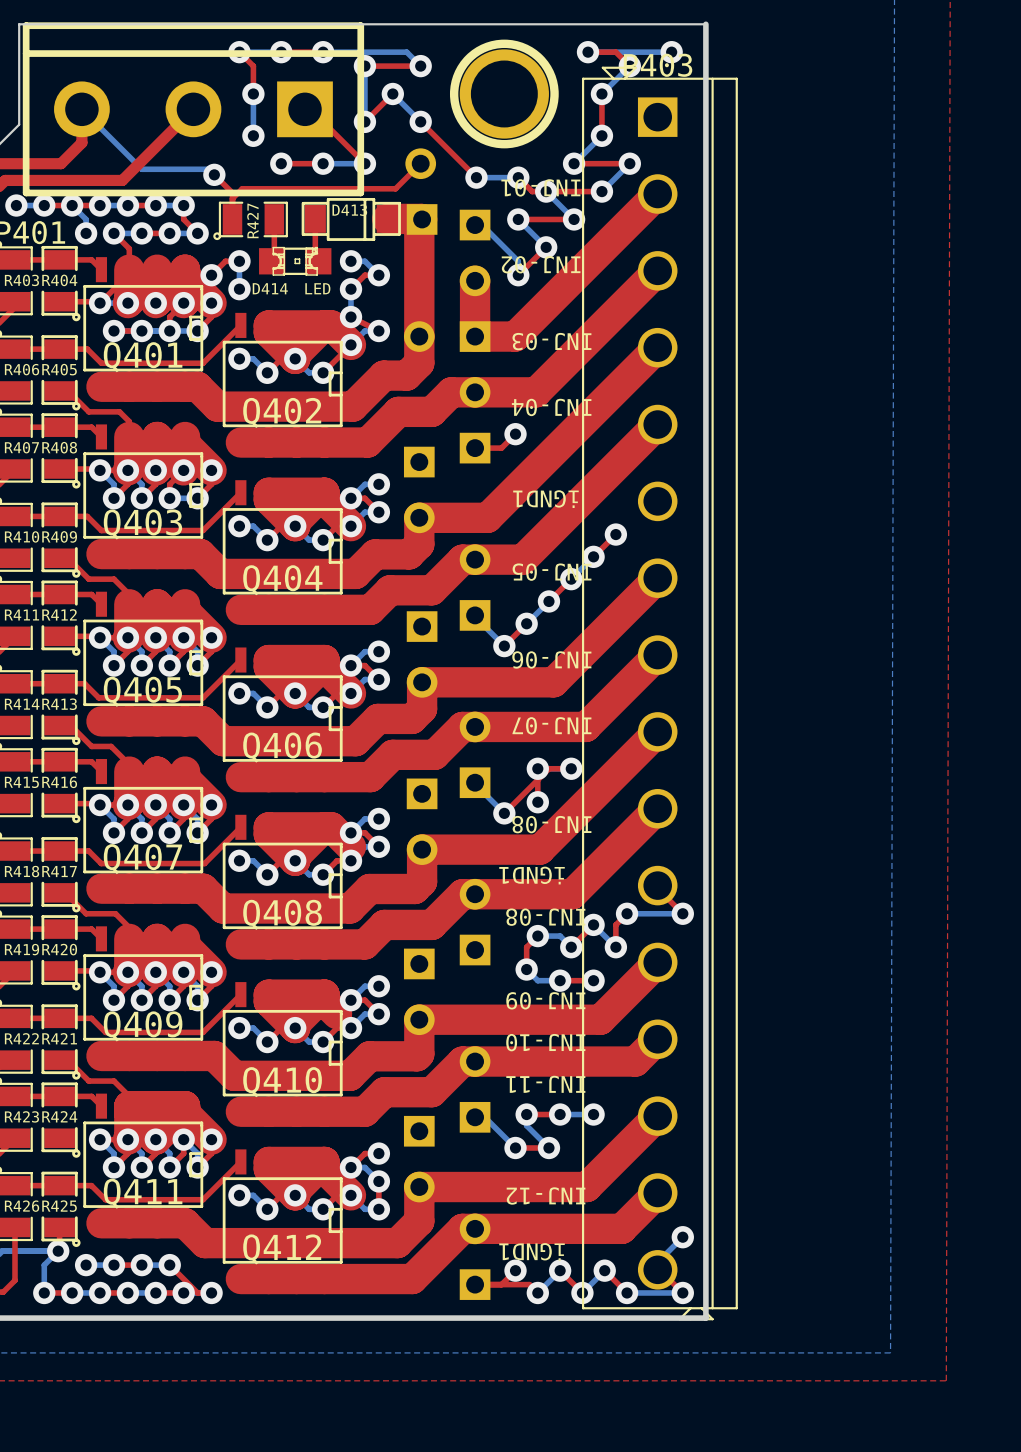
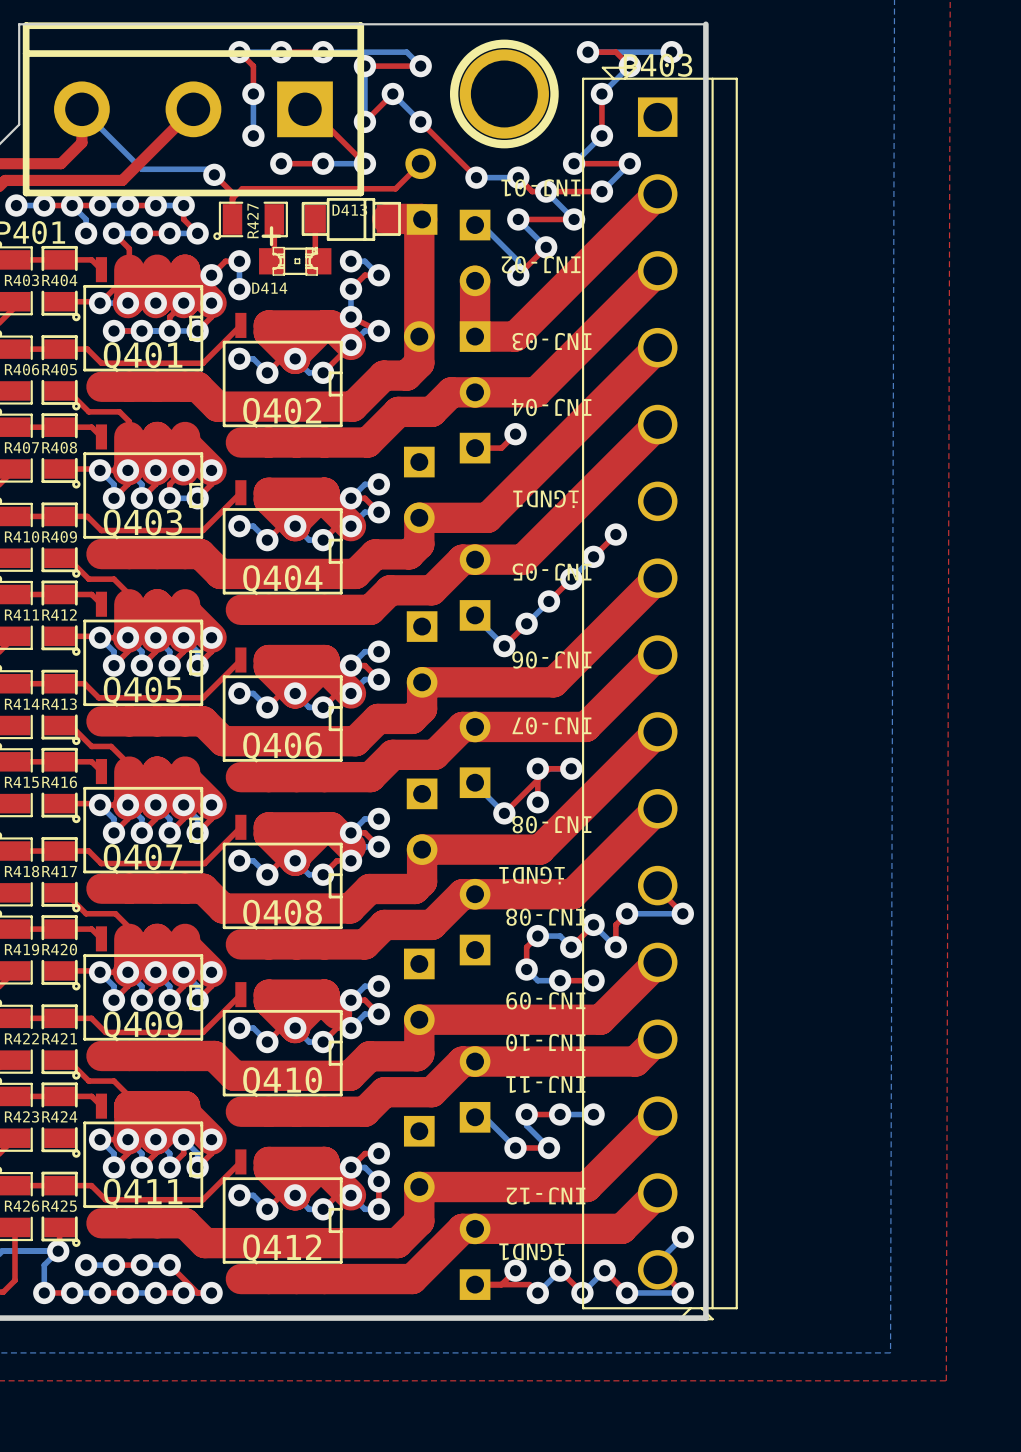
D414 footprint: [259, 246, 332, 276] -> [259, 226, 332, 276]
D414 value: LED (317, 288) -> none

